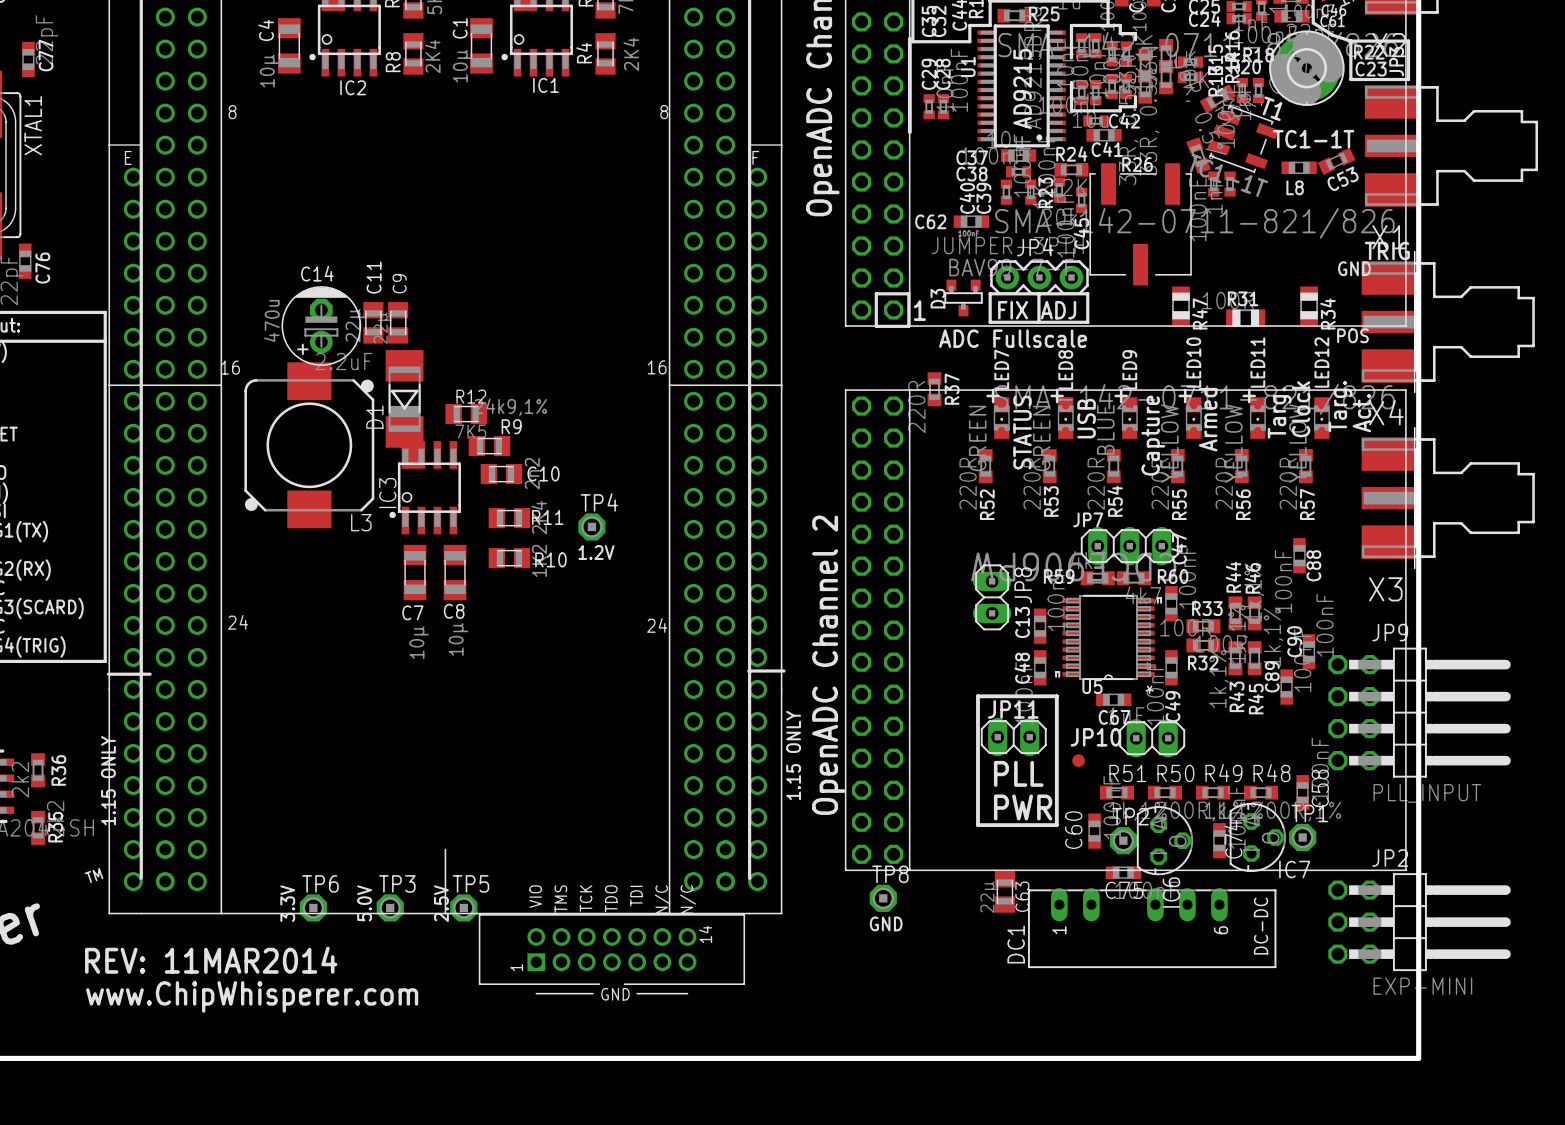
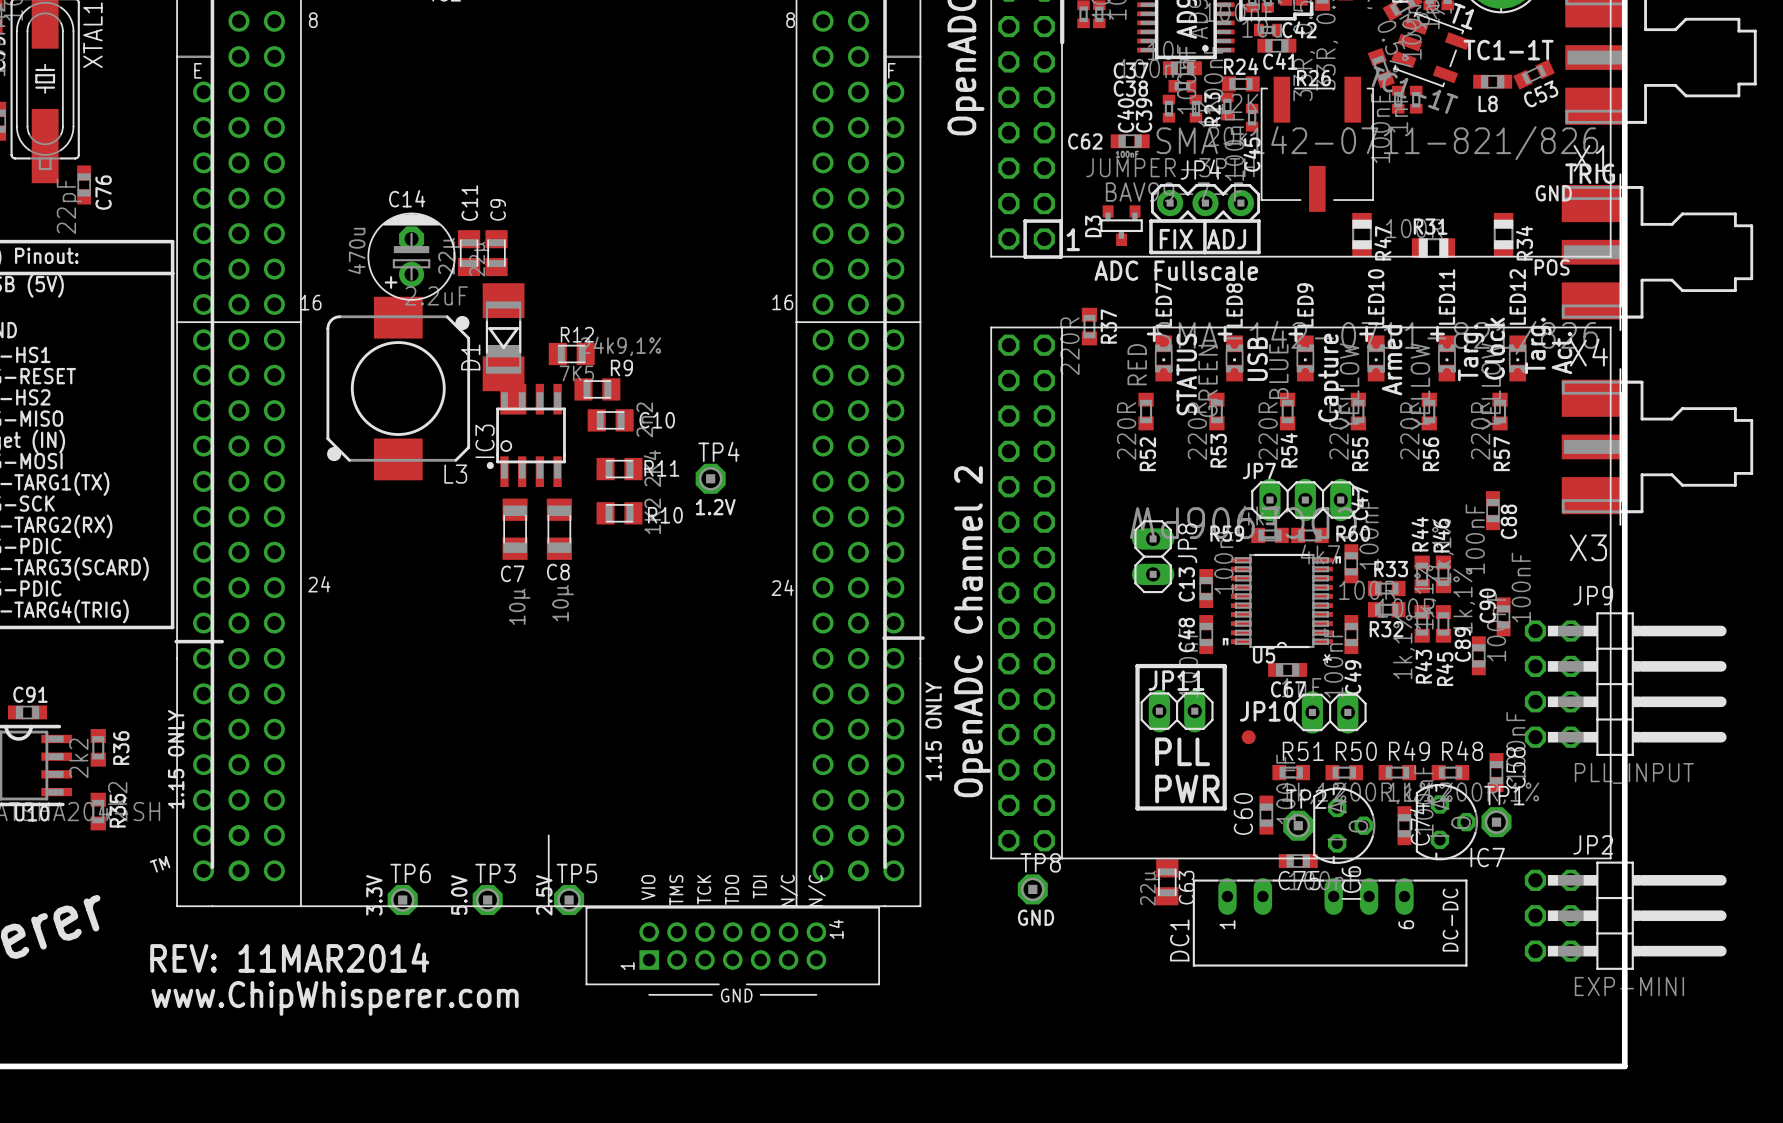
LED7 value: GREEN (977, 438) -> RED (1137, 364)

